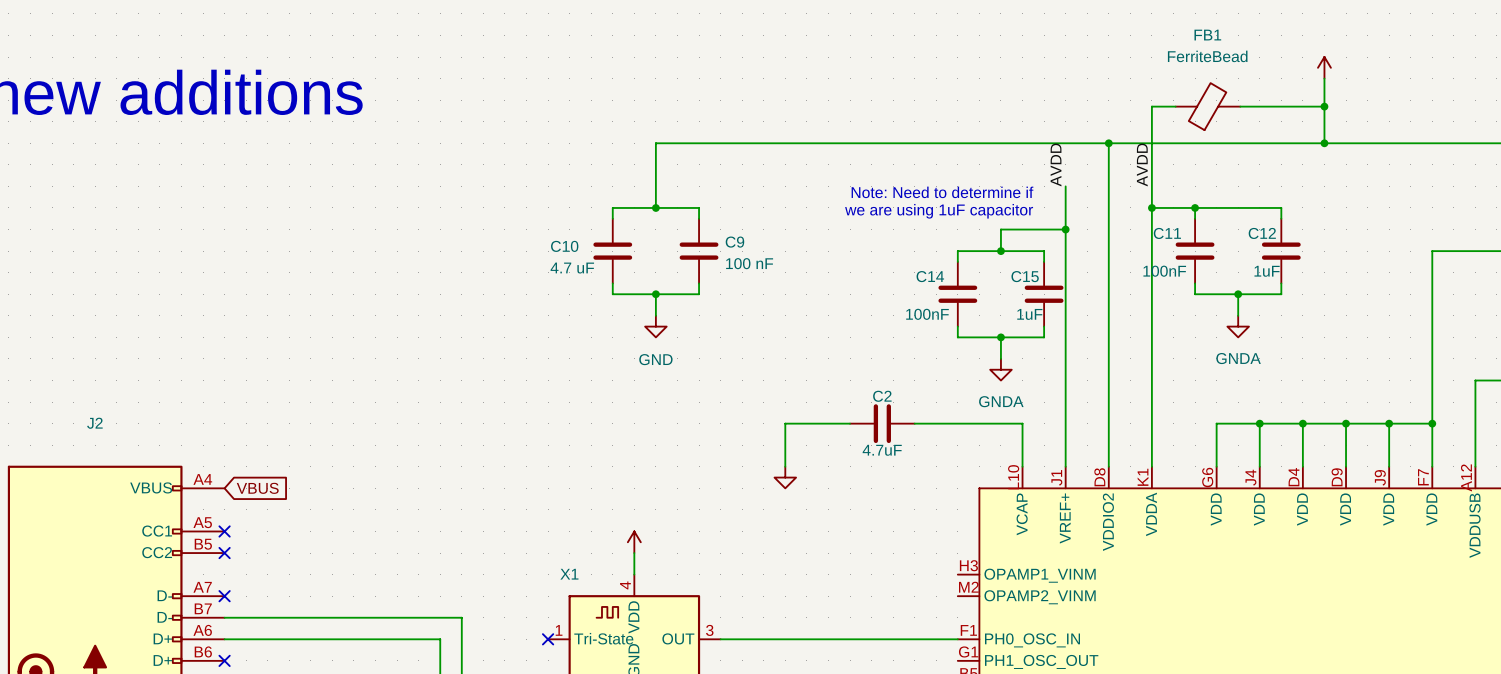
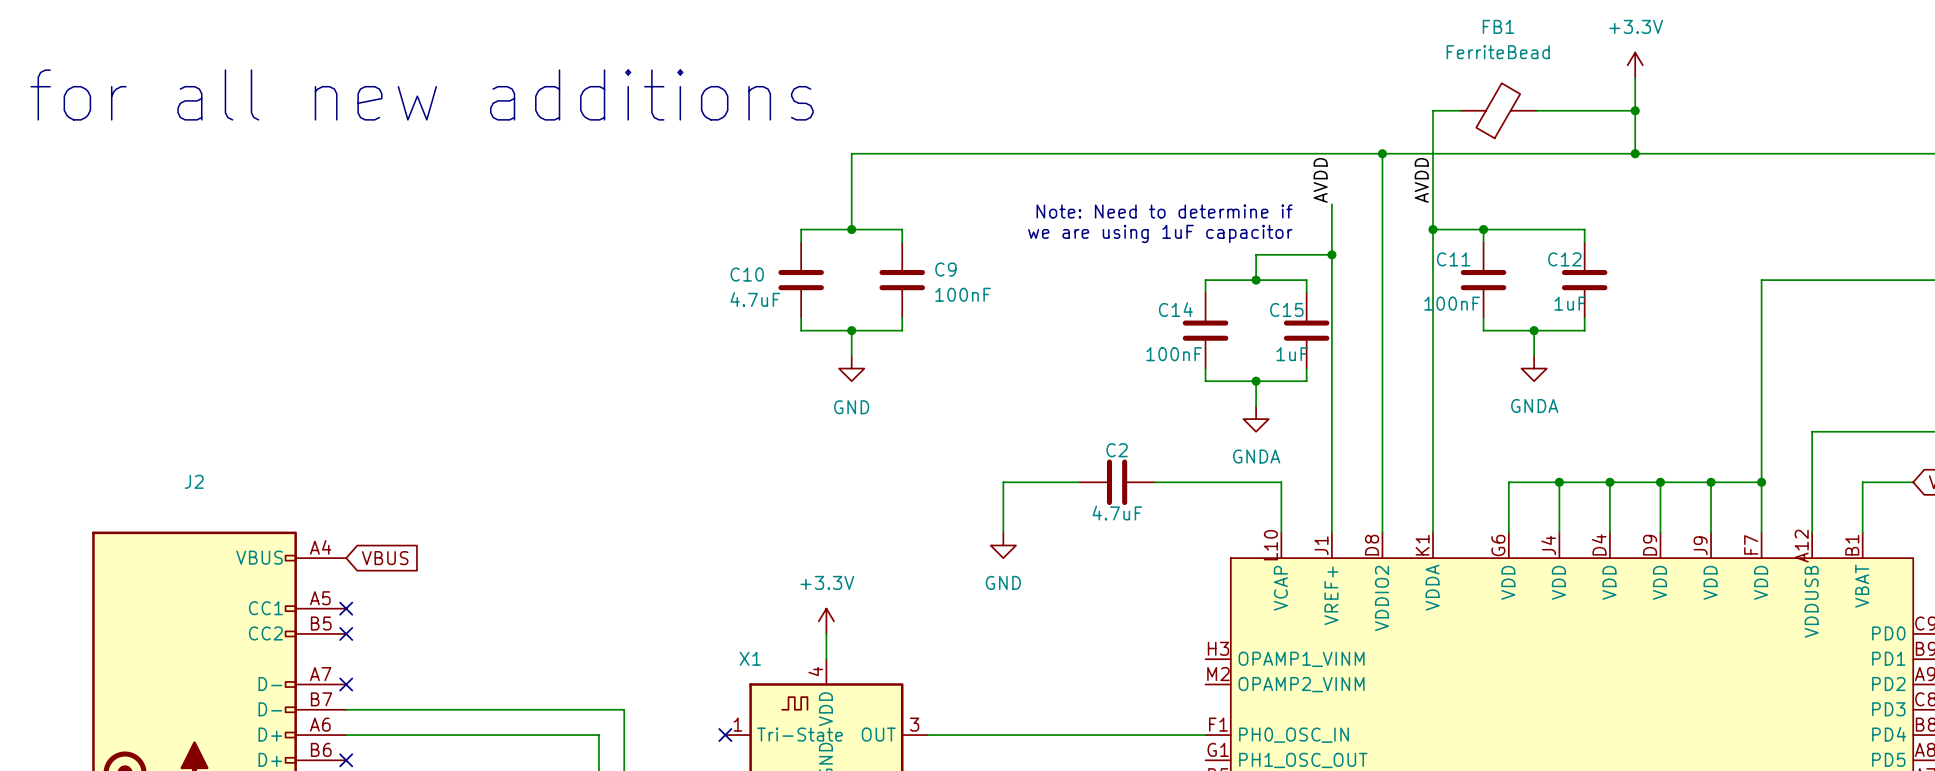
power symbol text: none -> +3.3V (1636, 26)
C9 value: 100 nF (749, 263) -> 100nF (963, 294)
C10 value: 4.7 uF (572, 268) -> 4.7uF (755, 299)
power symbol text: none -> +3.3V (827, 582)
power symbol text: none -> GND (1003, 582)

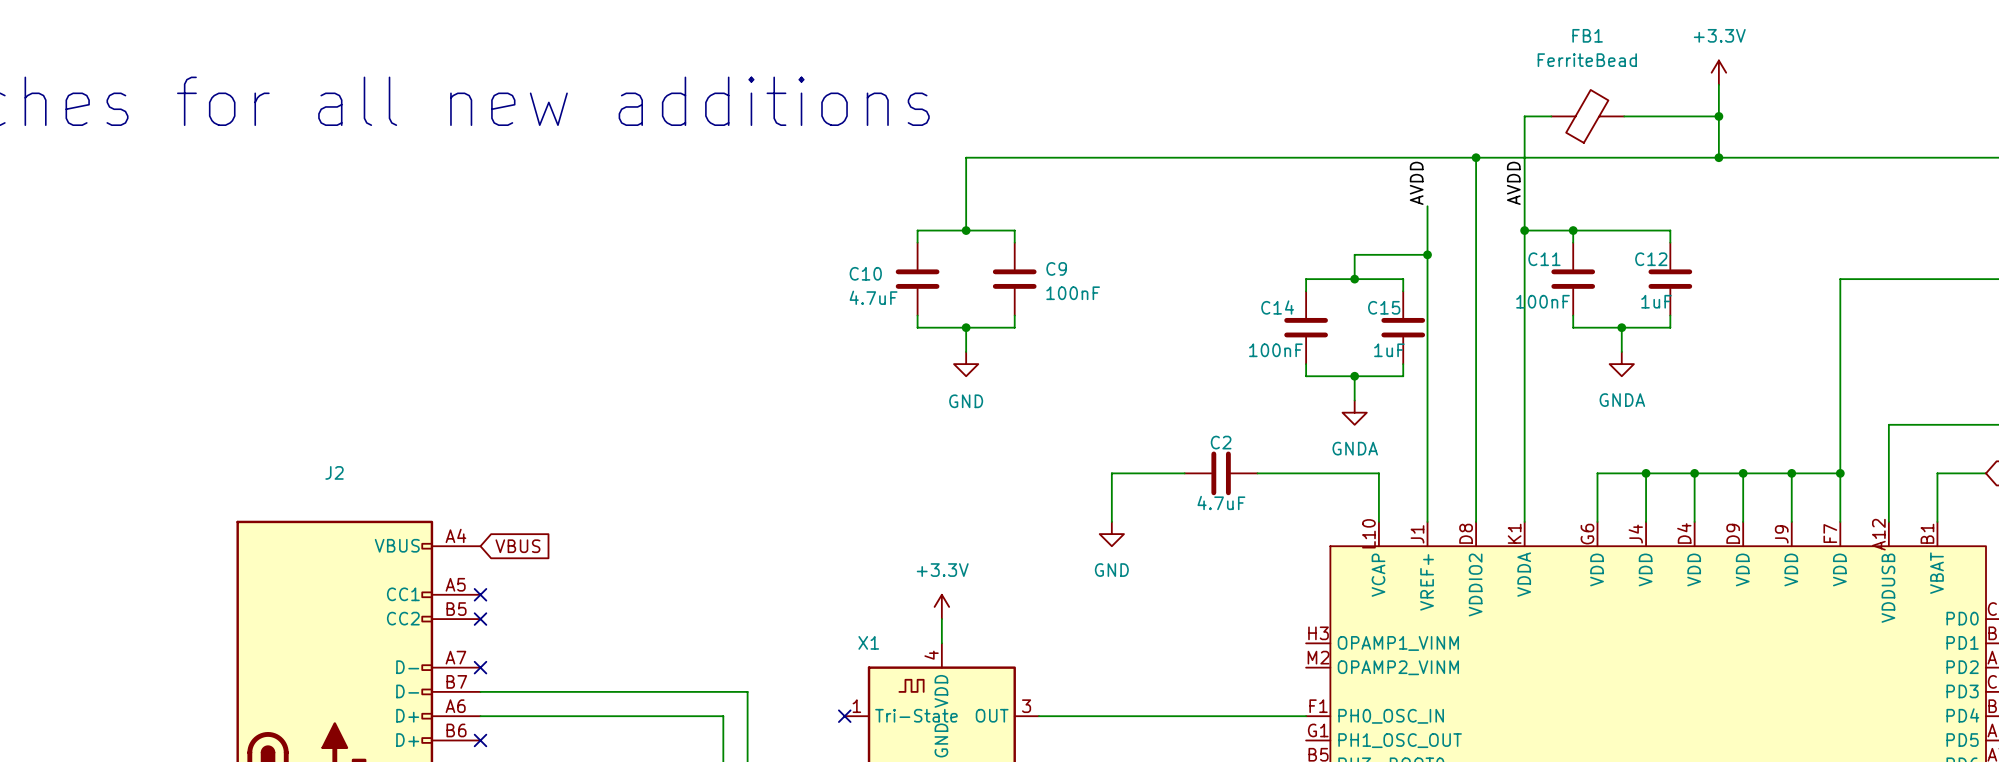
text: Note: Need to determine if (1164, 211) -> none
text: we are using 1uF capacitor (1160, 233) -> none

